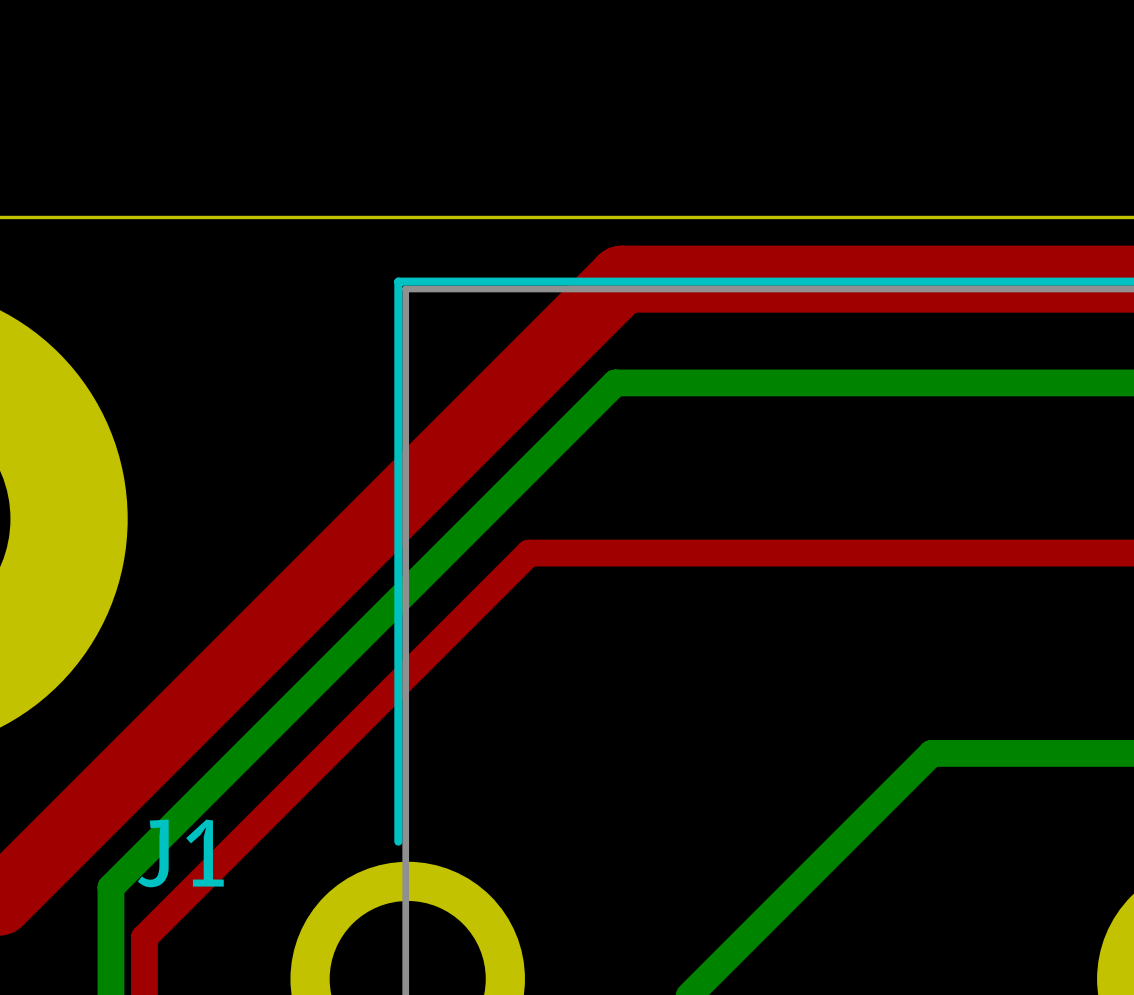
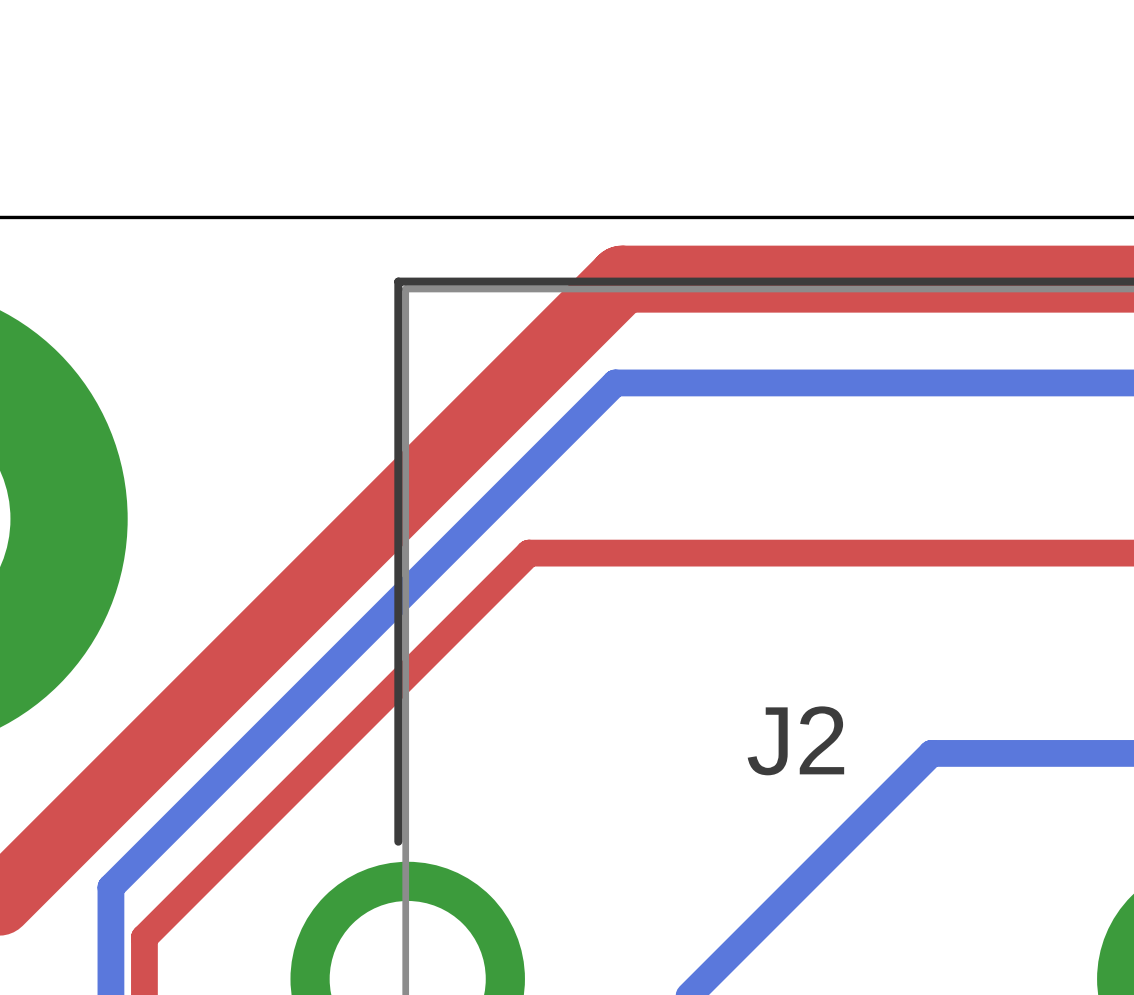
J1 name: J1 (180, 853) -> J2 (795, 740)

